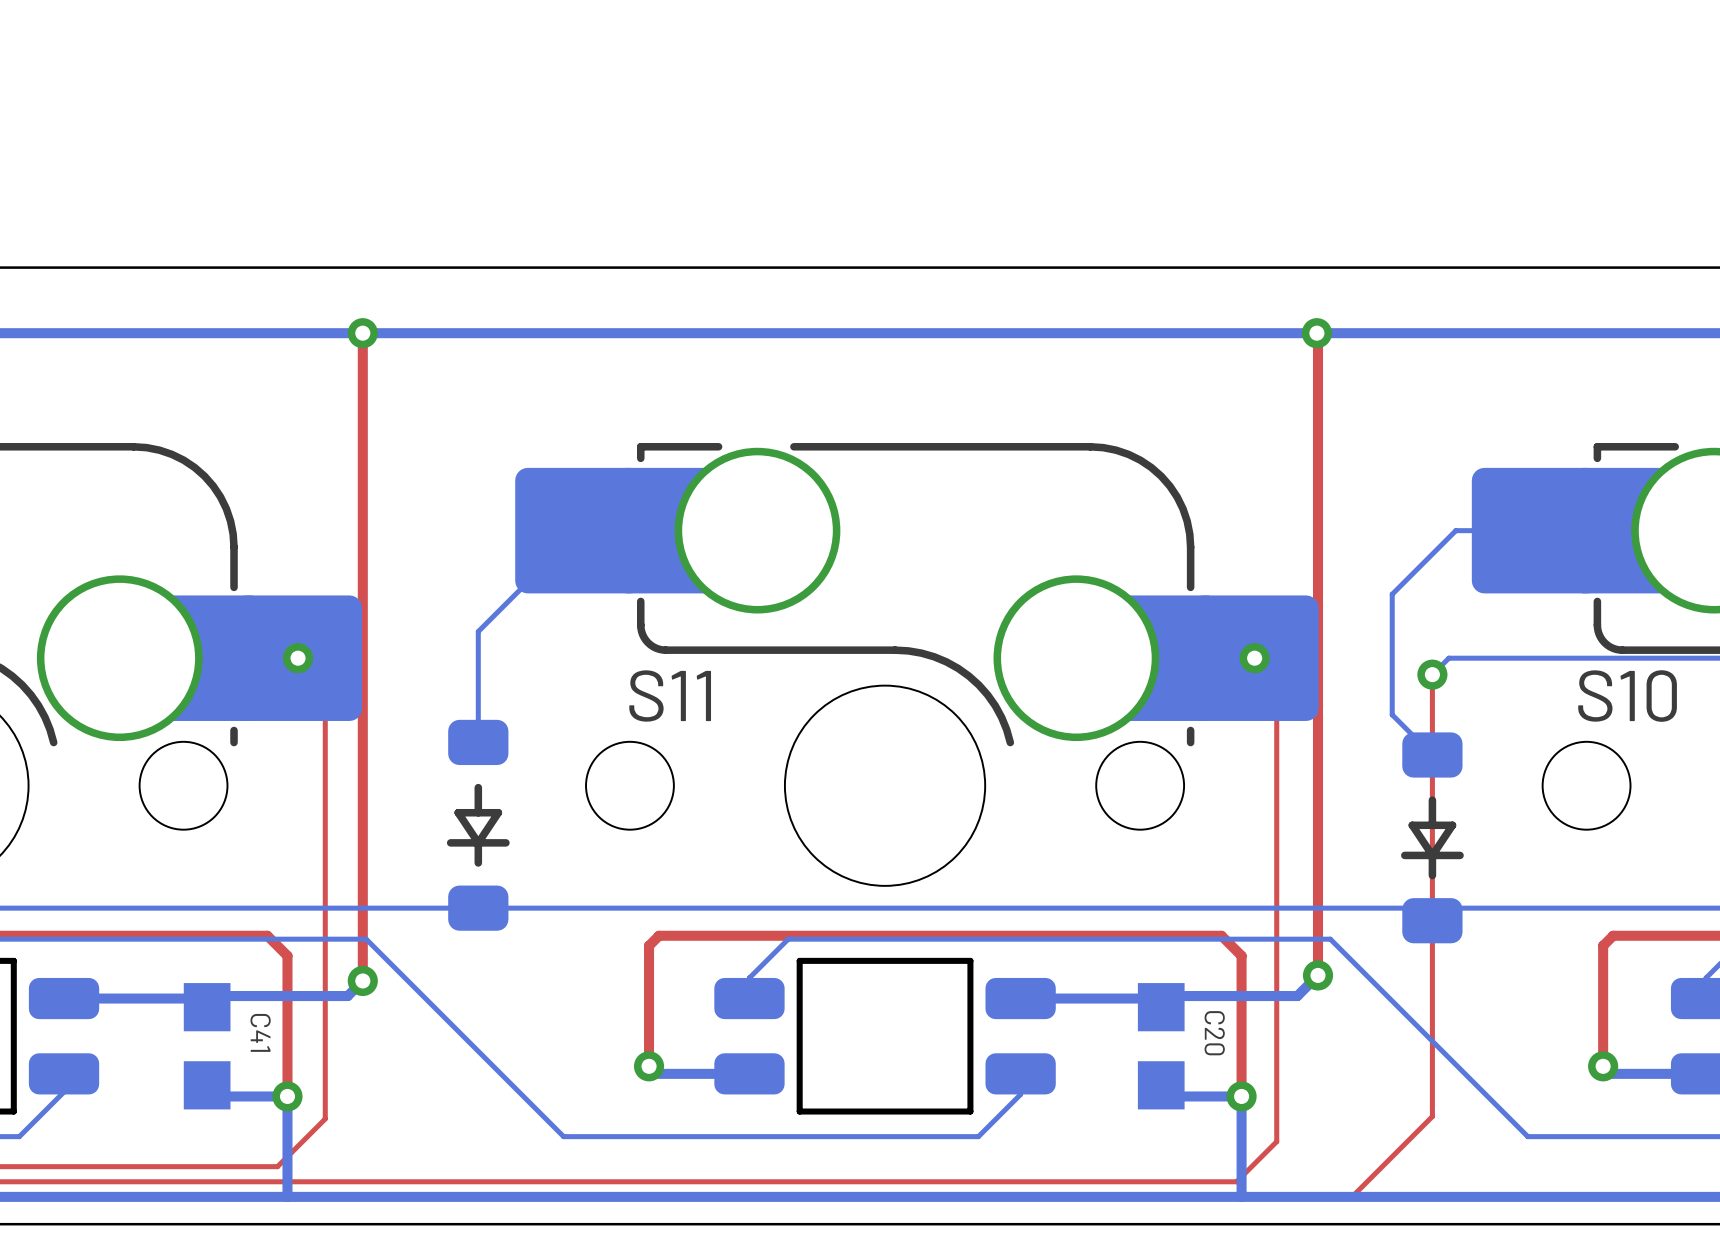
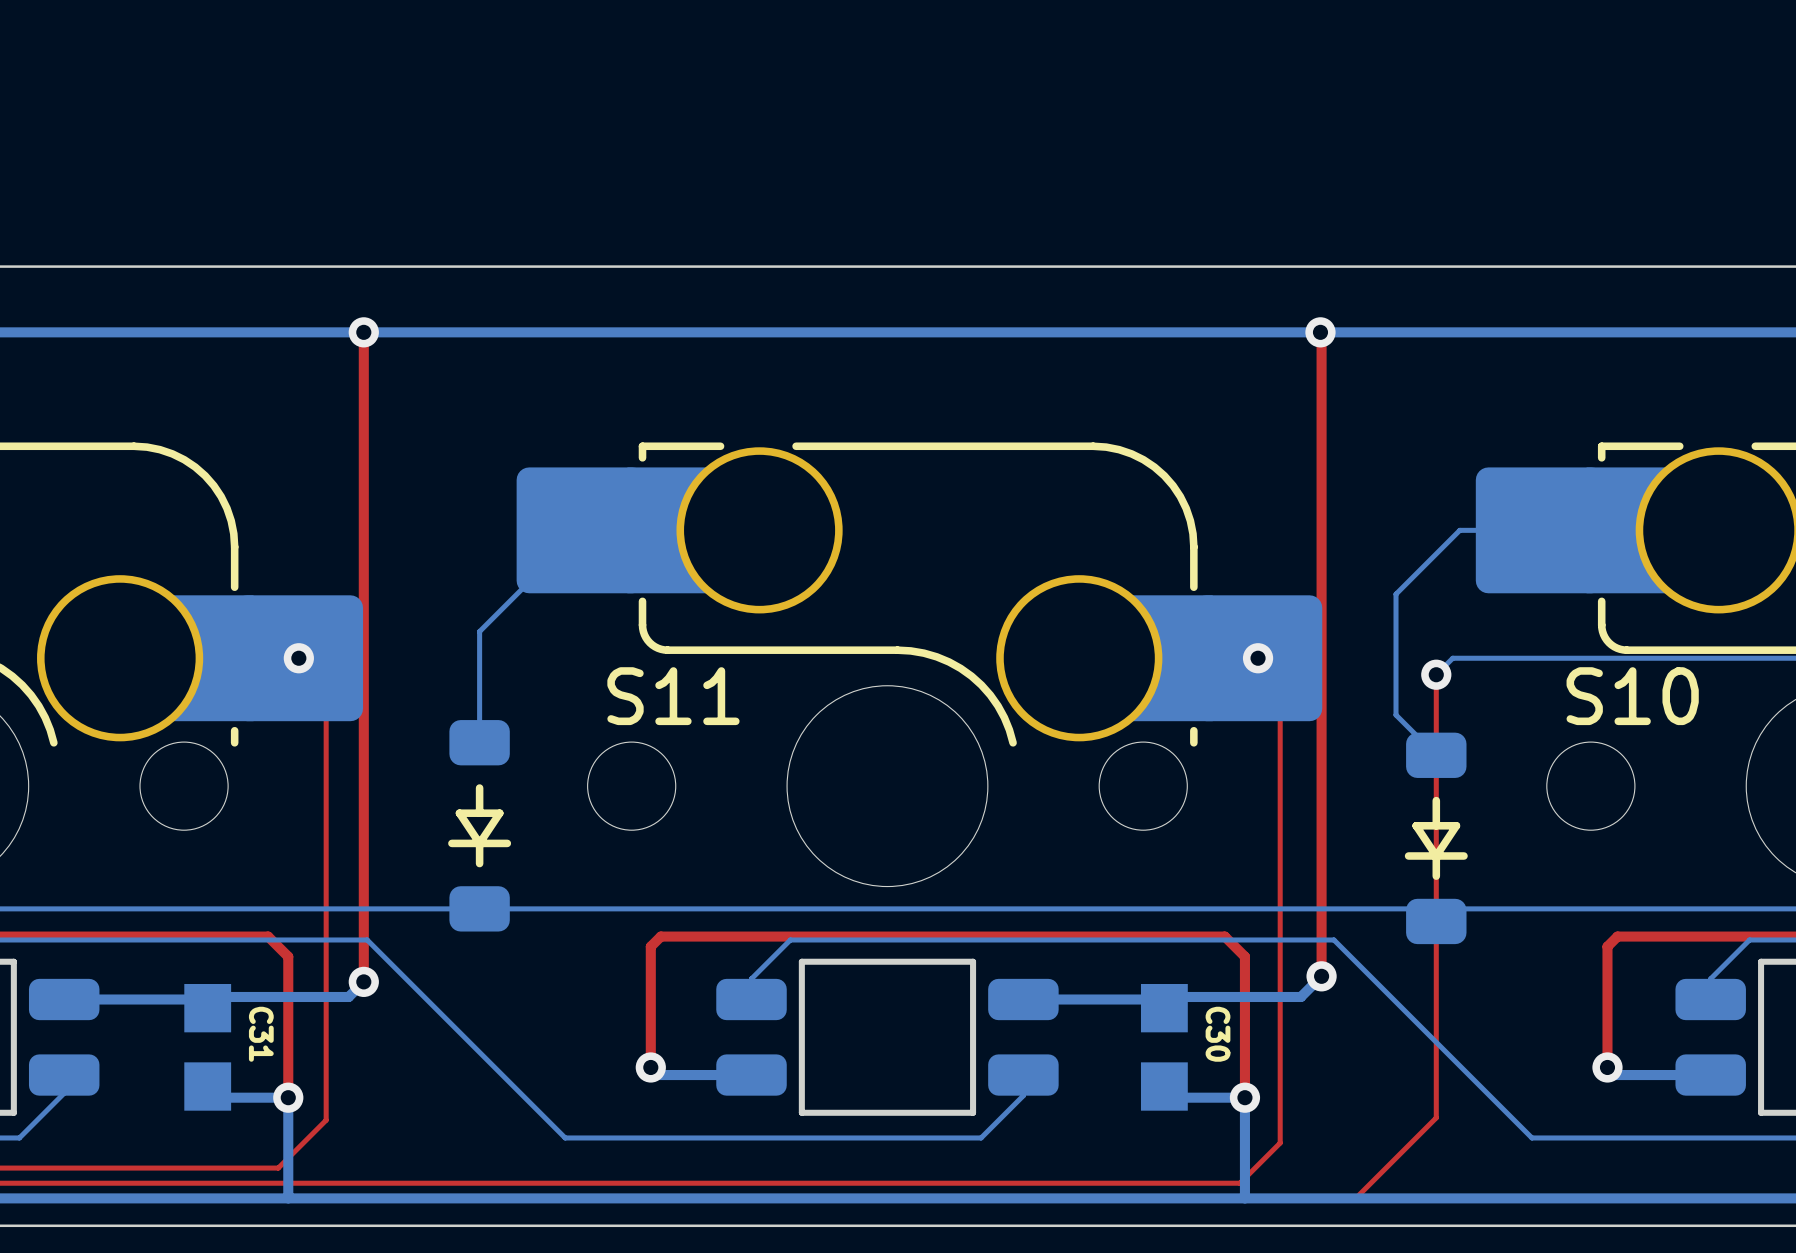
C41 name: C41 (260, 1032) -> C31 (261, 1034)
C20 name: C20 (1214, 1033) -> C30 (1218, 1034)

